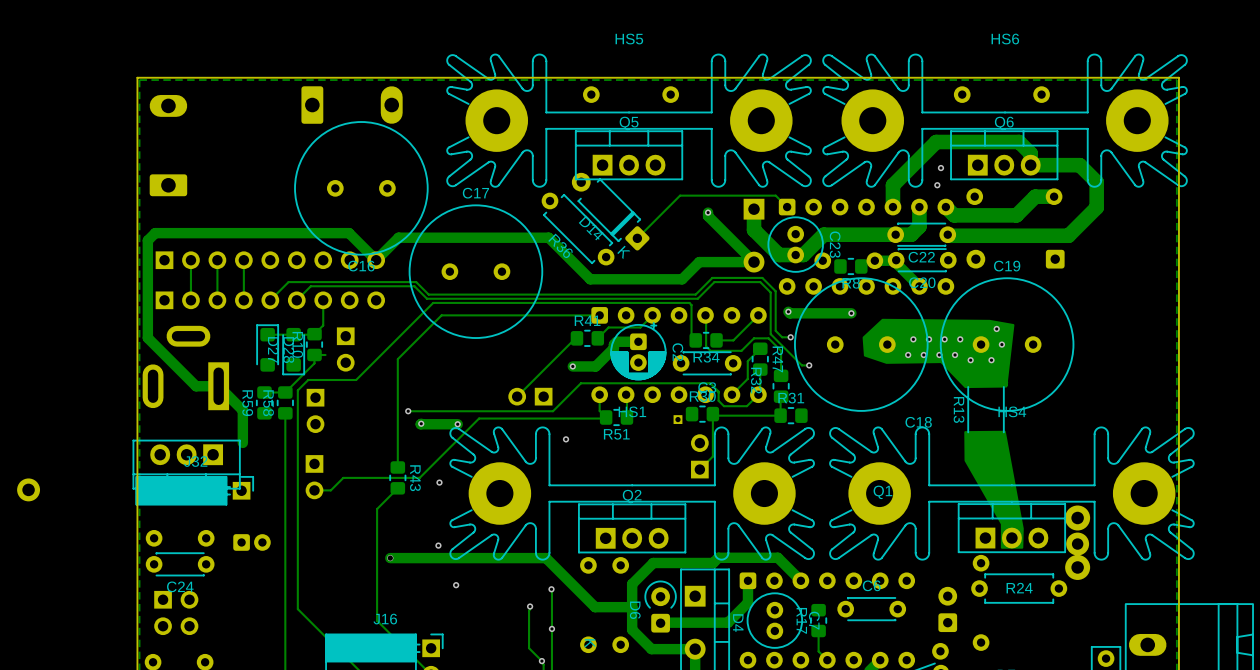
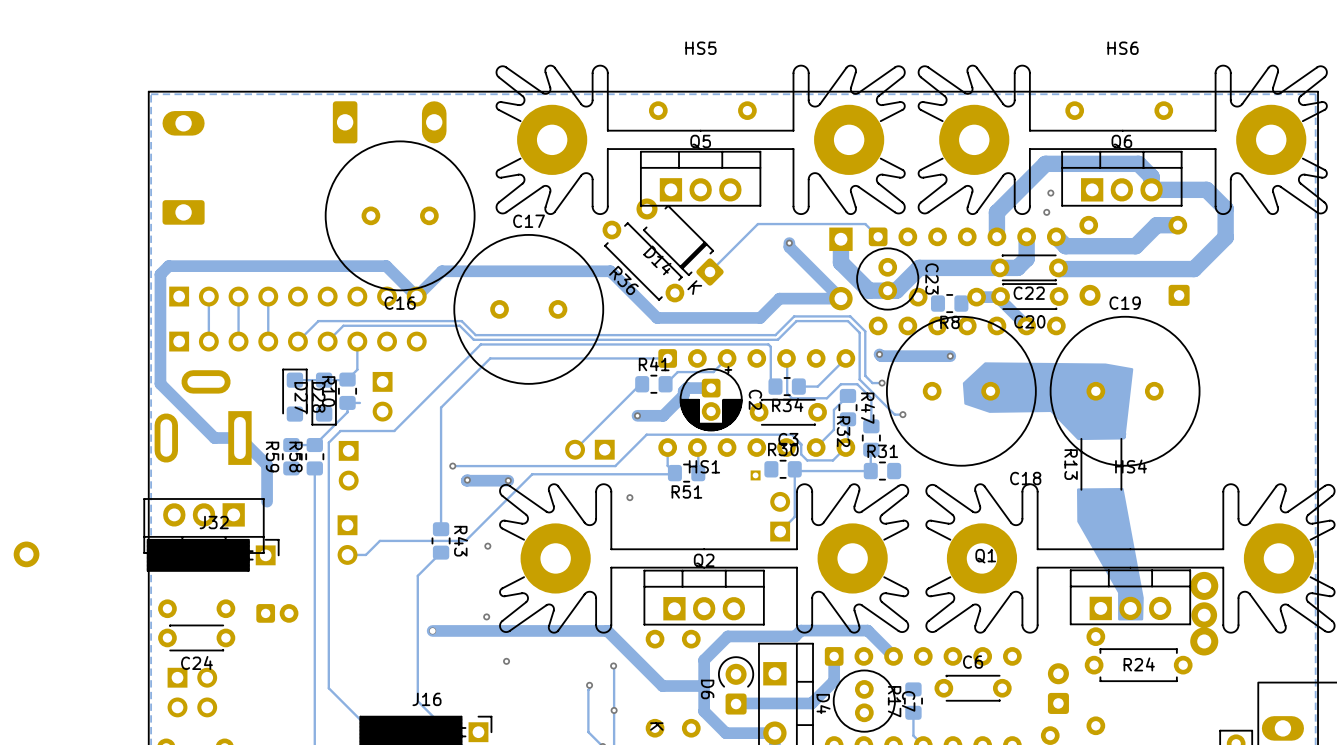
via: (996, 328) -> none
via: (913, 339) -> none
via: (929, 339) -> none
via: (944, 339) -> none
via: (960, 339) -> none
via: (1001, 344) -> none
via: (908, 355) -> none
via: (923, 355) -> none
via: (939, 355) -> none
via: (955, 355) -> none
via: (970, 360) -> none
via: (991, 360) -> none

